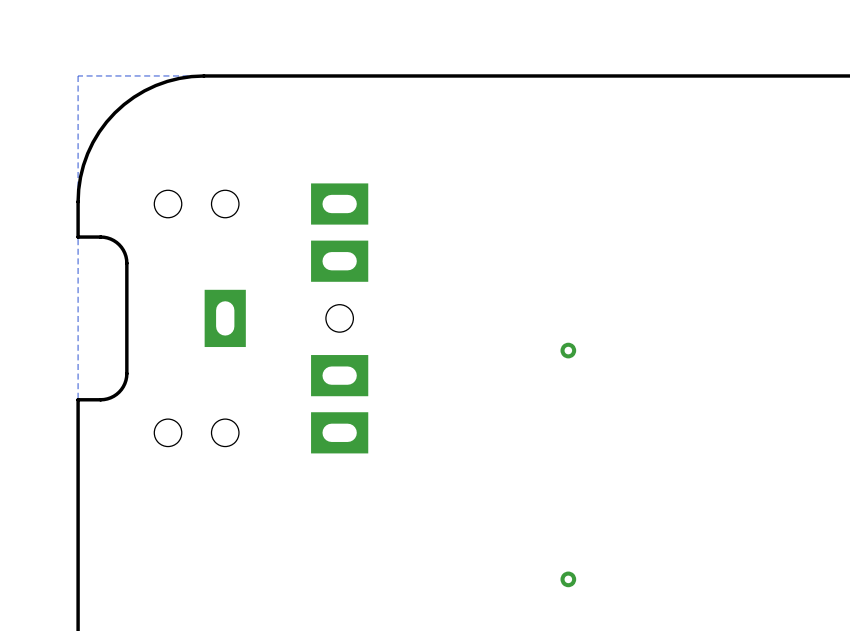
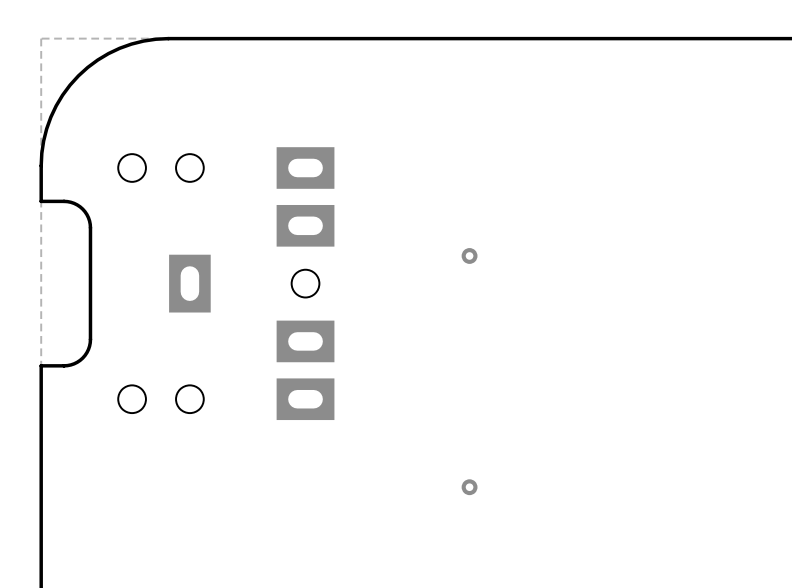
via position: (568, 350) -> (469, 255)
via position: (568, 579) -> (469, 487)

